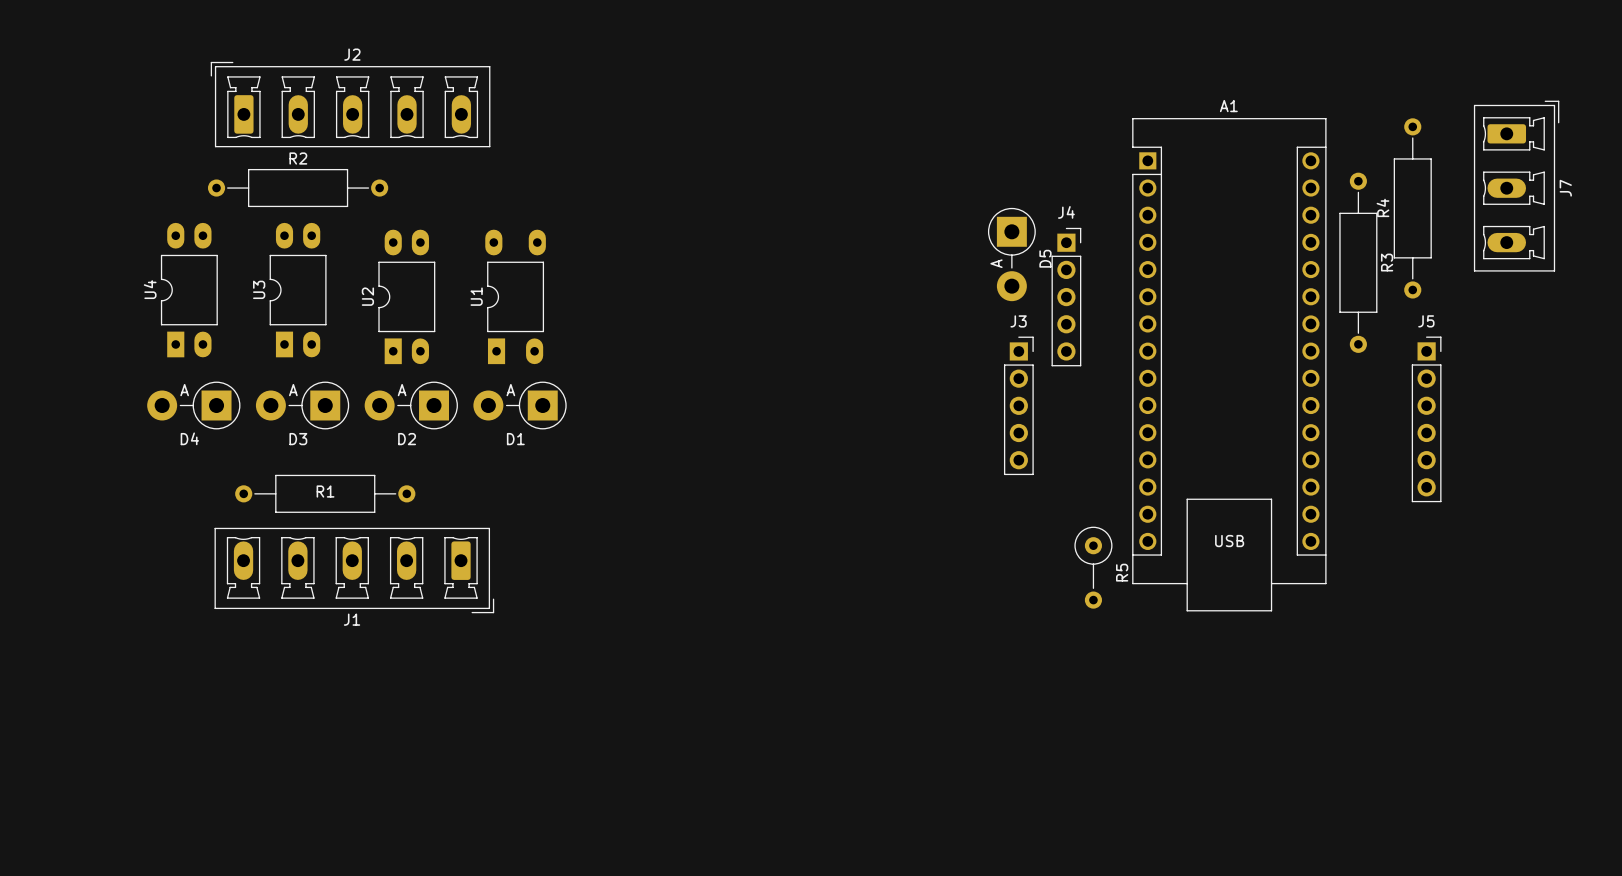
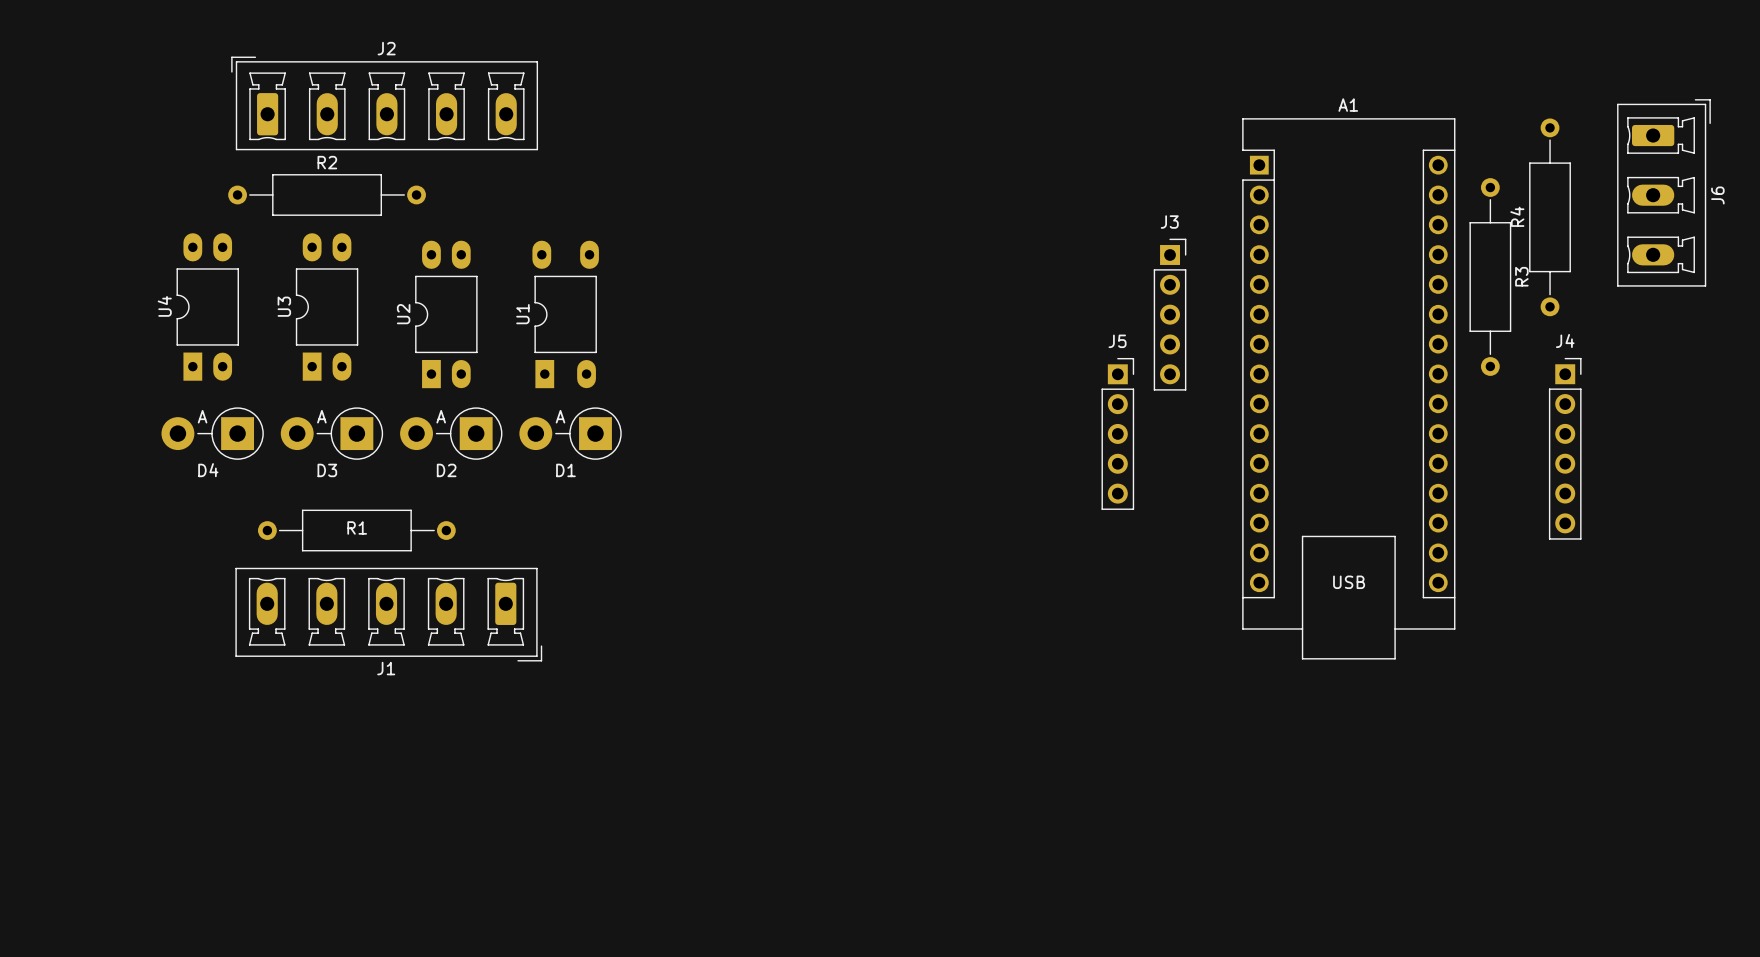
J7 name: J7 (1565, 188) -> J6 (1717, 195)
J4 name: J4 (1066, 212) -> J3 (1169, 222)
D5: (1011, 254) -> none
J3 name: J3 (1018, 321) -> J5 (1117, 341)
J5 name: J5 (1426, 321) -> J4 (1565, 340)
R5: (1093, 567) -> none

